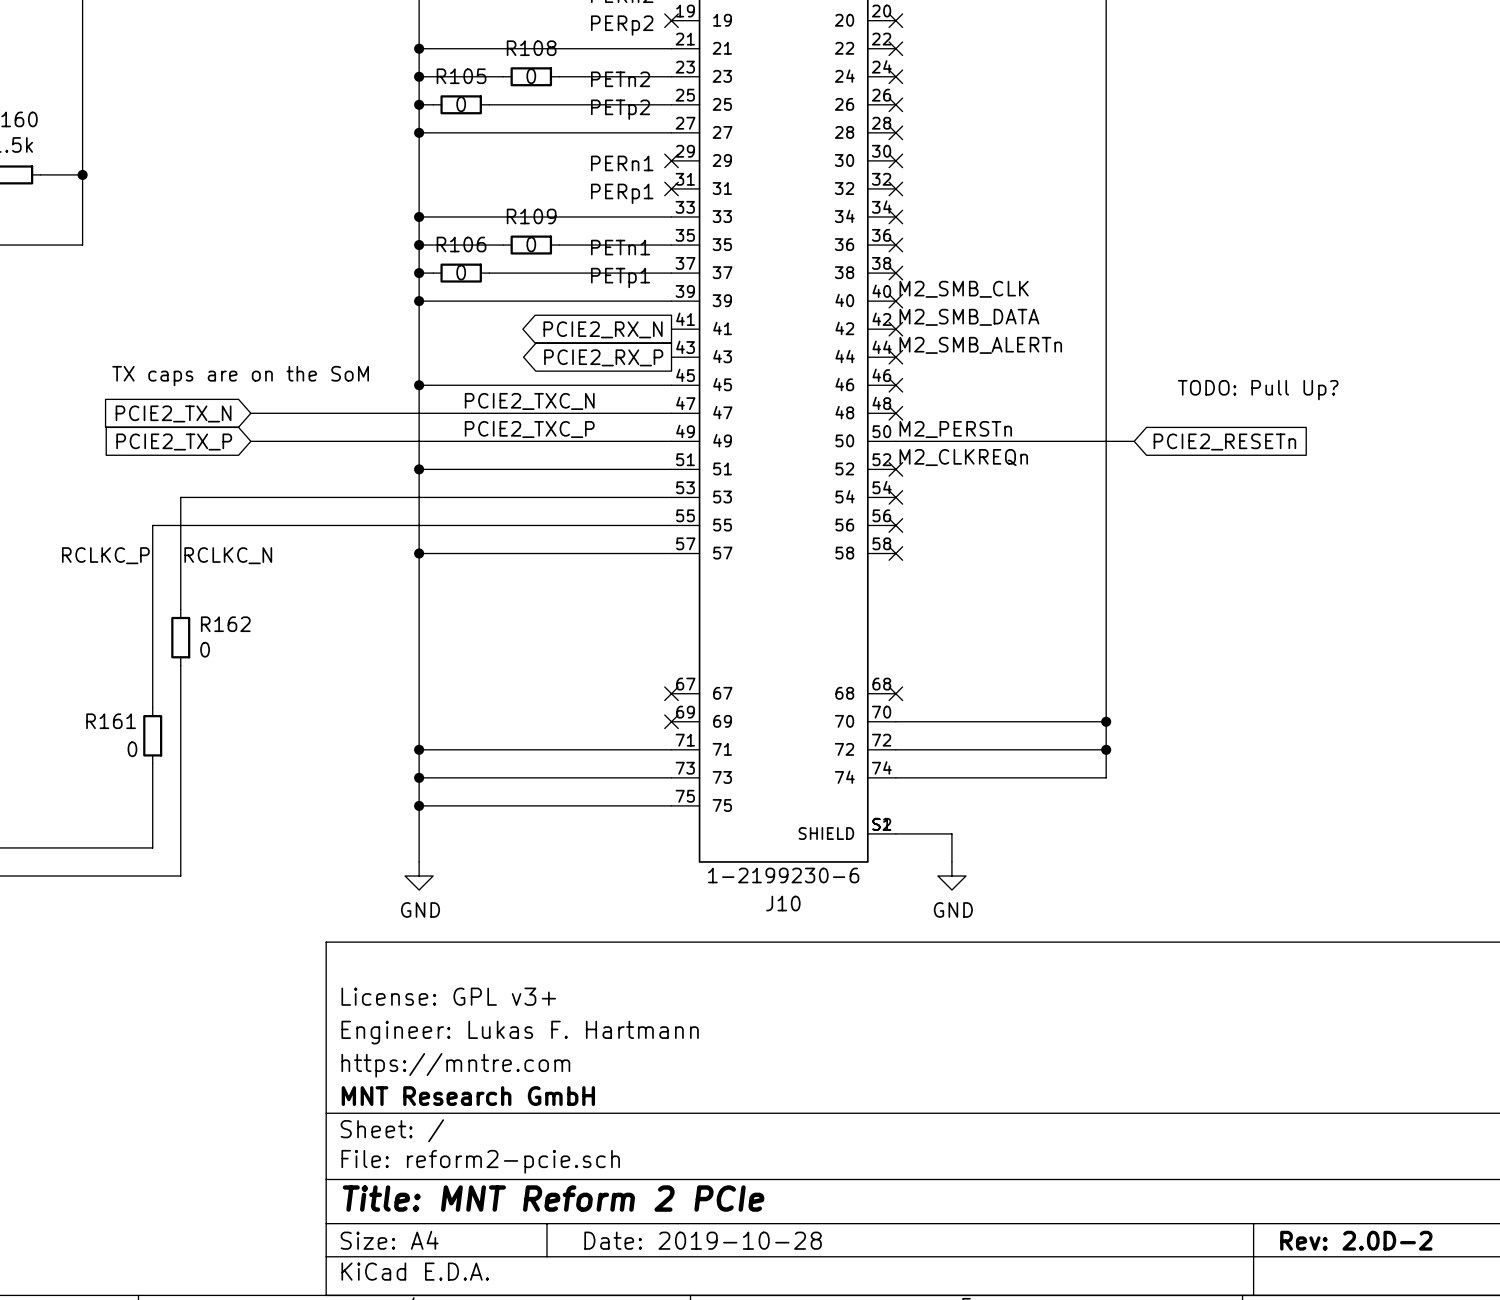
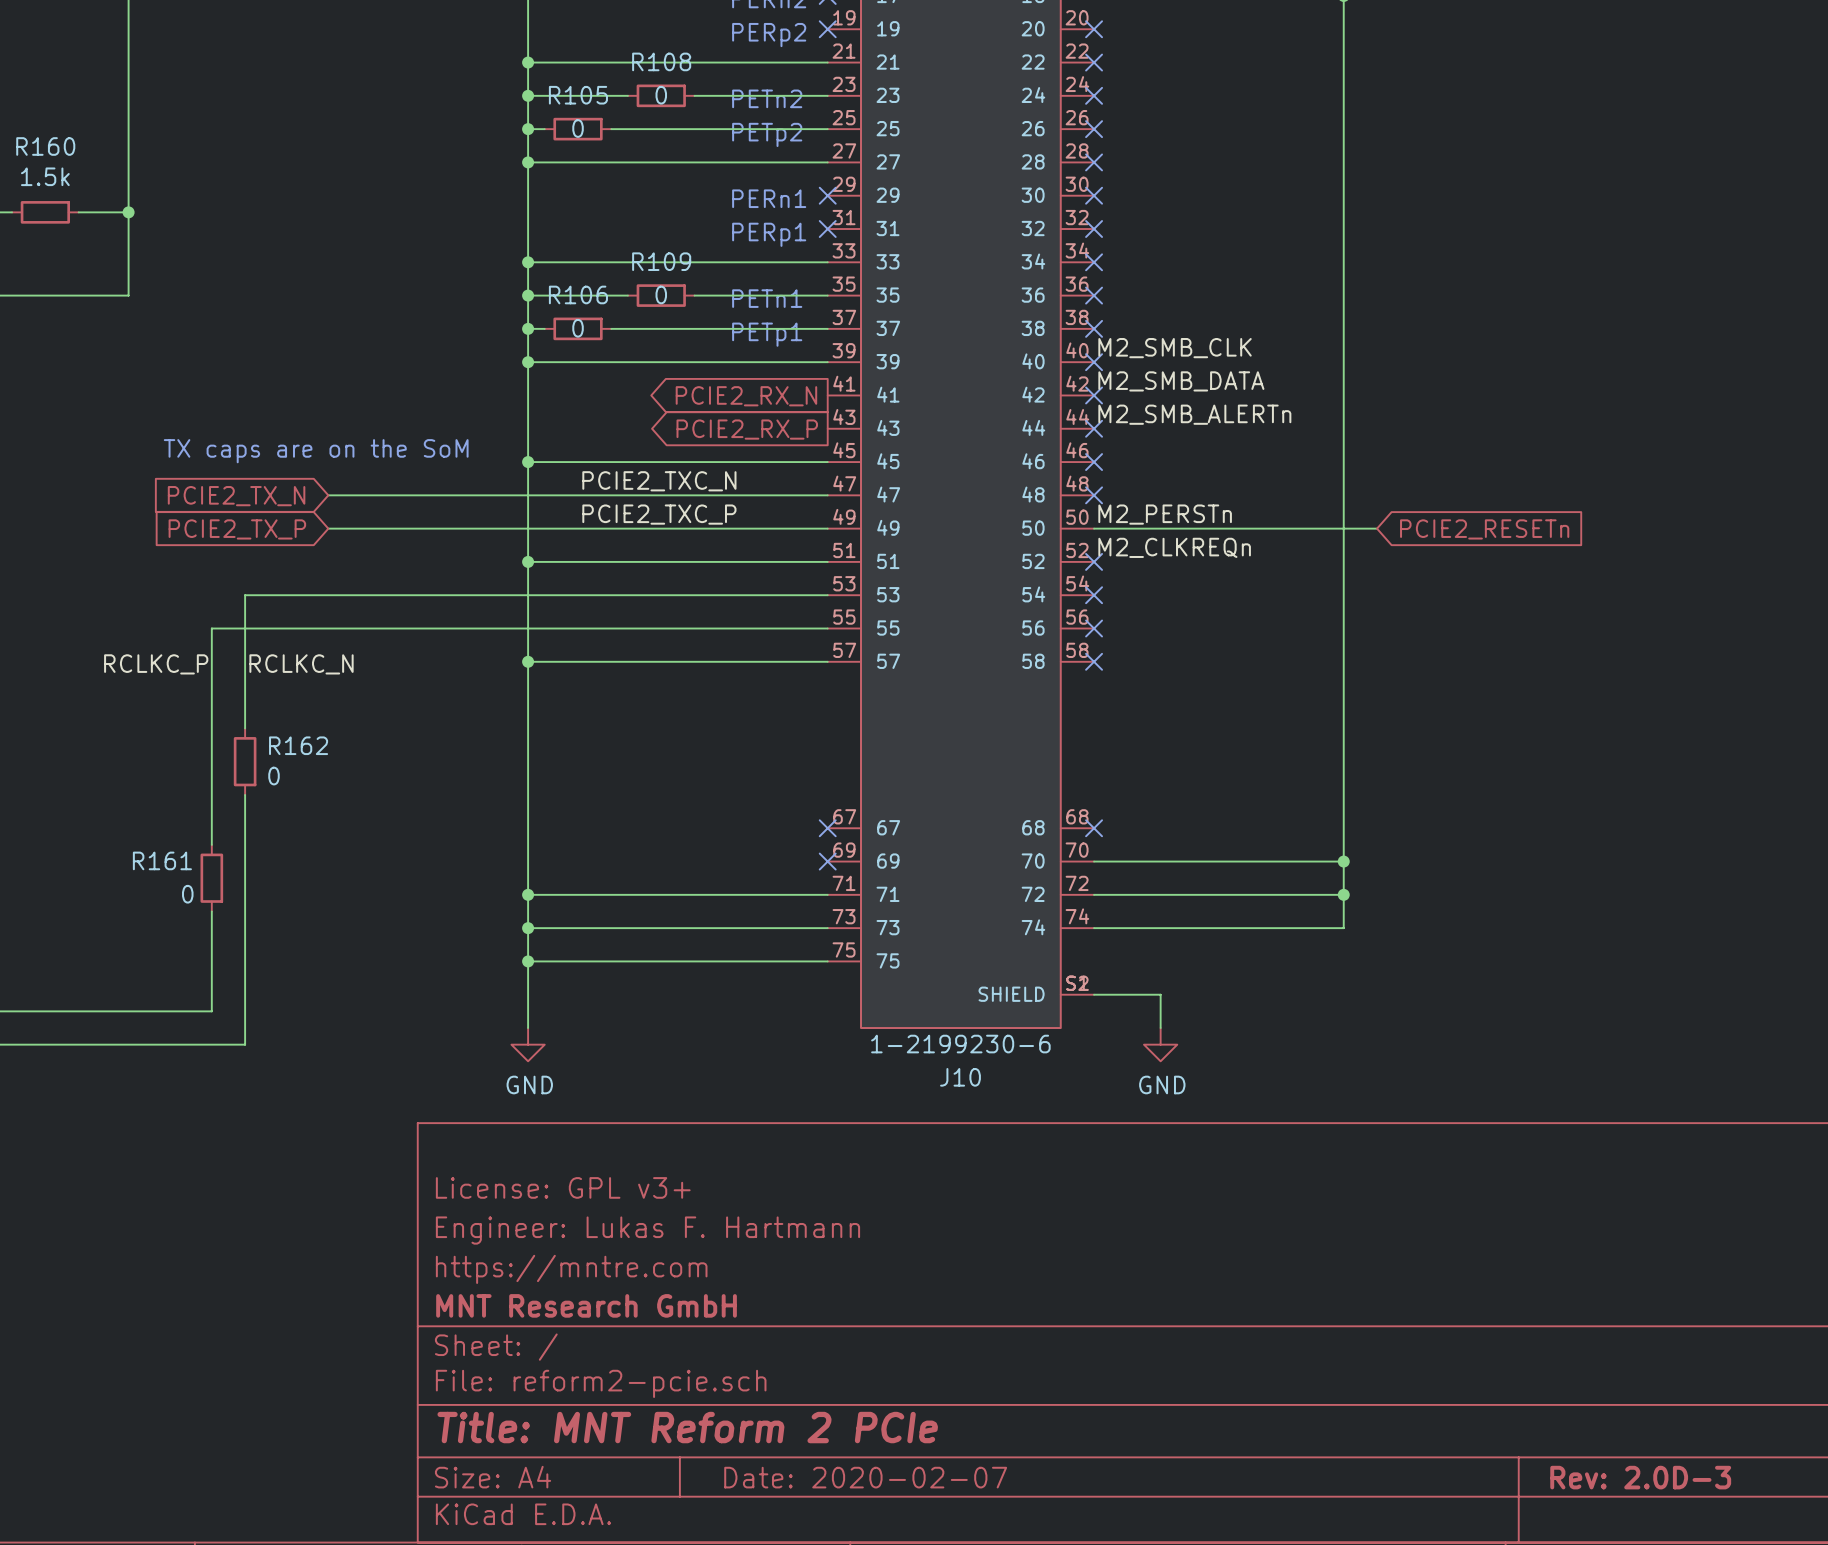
text: TODO: Pull Up? (1258, 390) -> none
title block: Date: 2019-10-28 (703, 1240) -> Date: 2020-02-07 (865, 1477)
title block: Rev: 2.0D-2 (1356, 1240) -> Rev: 2.0D-3 (1640, 1477)

